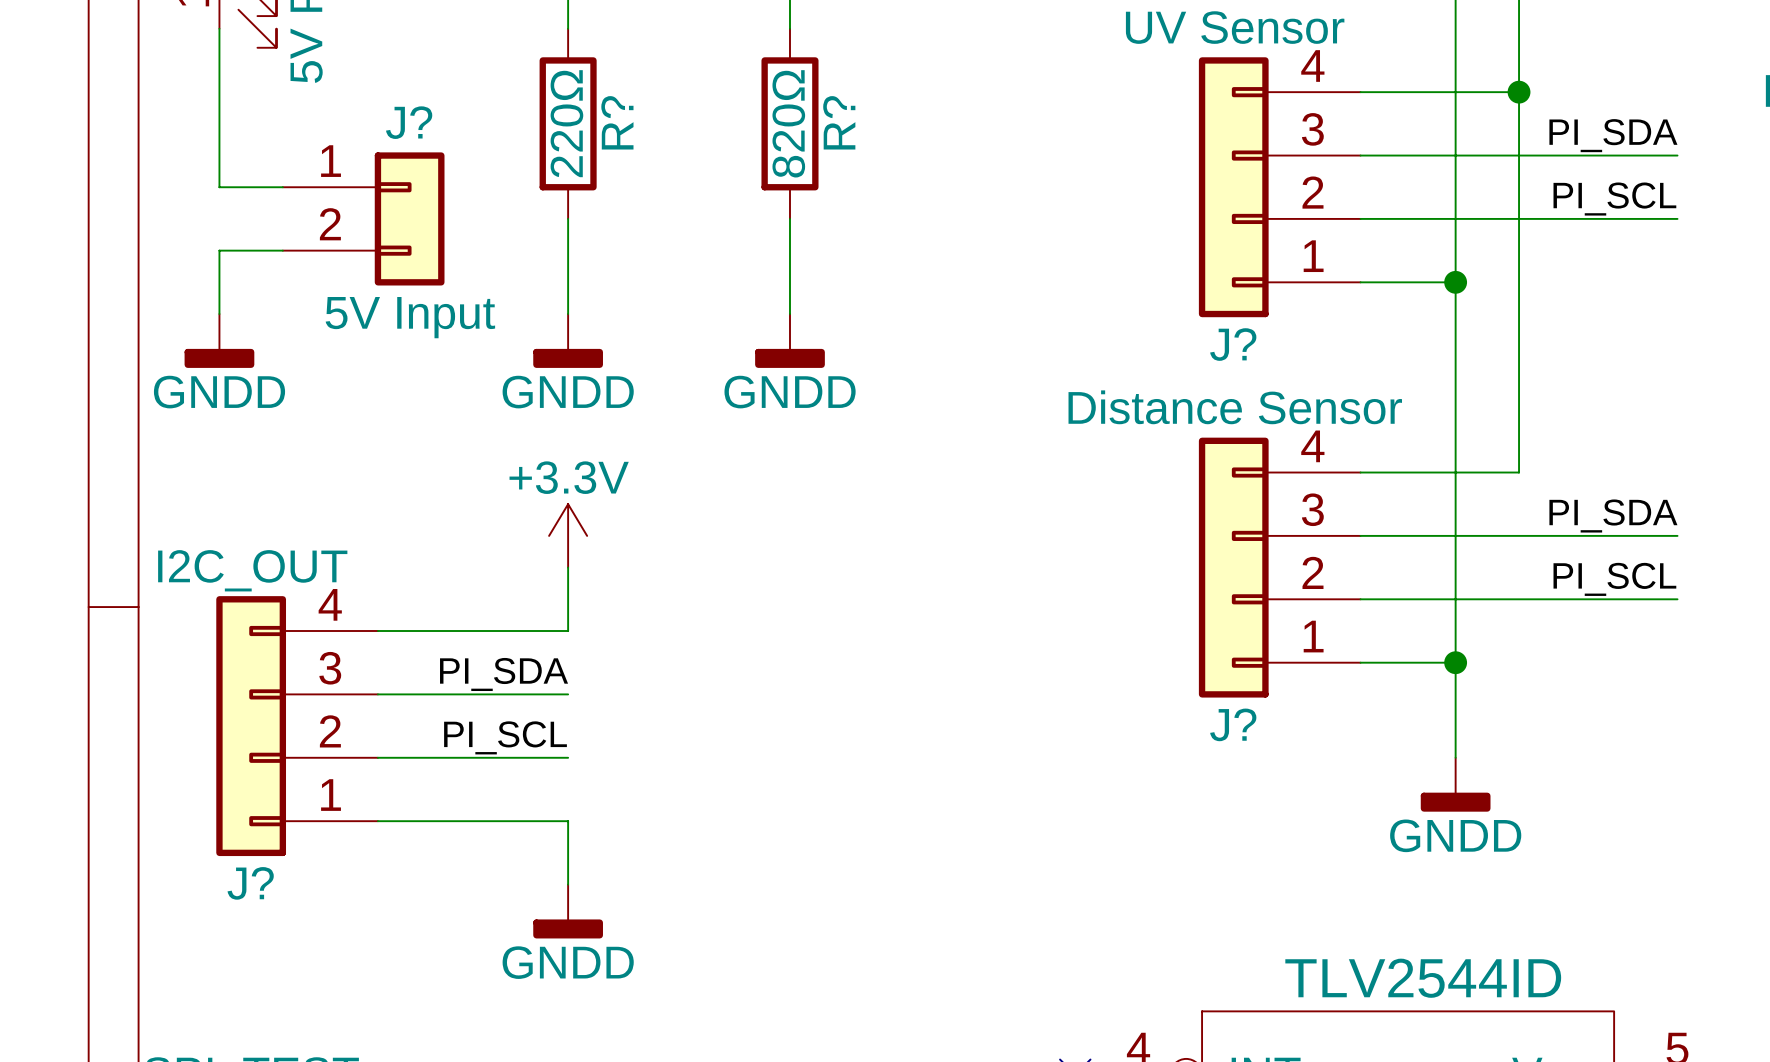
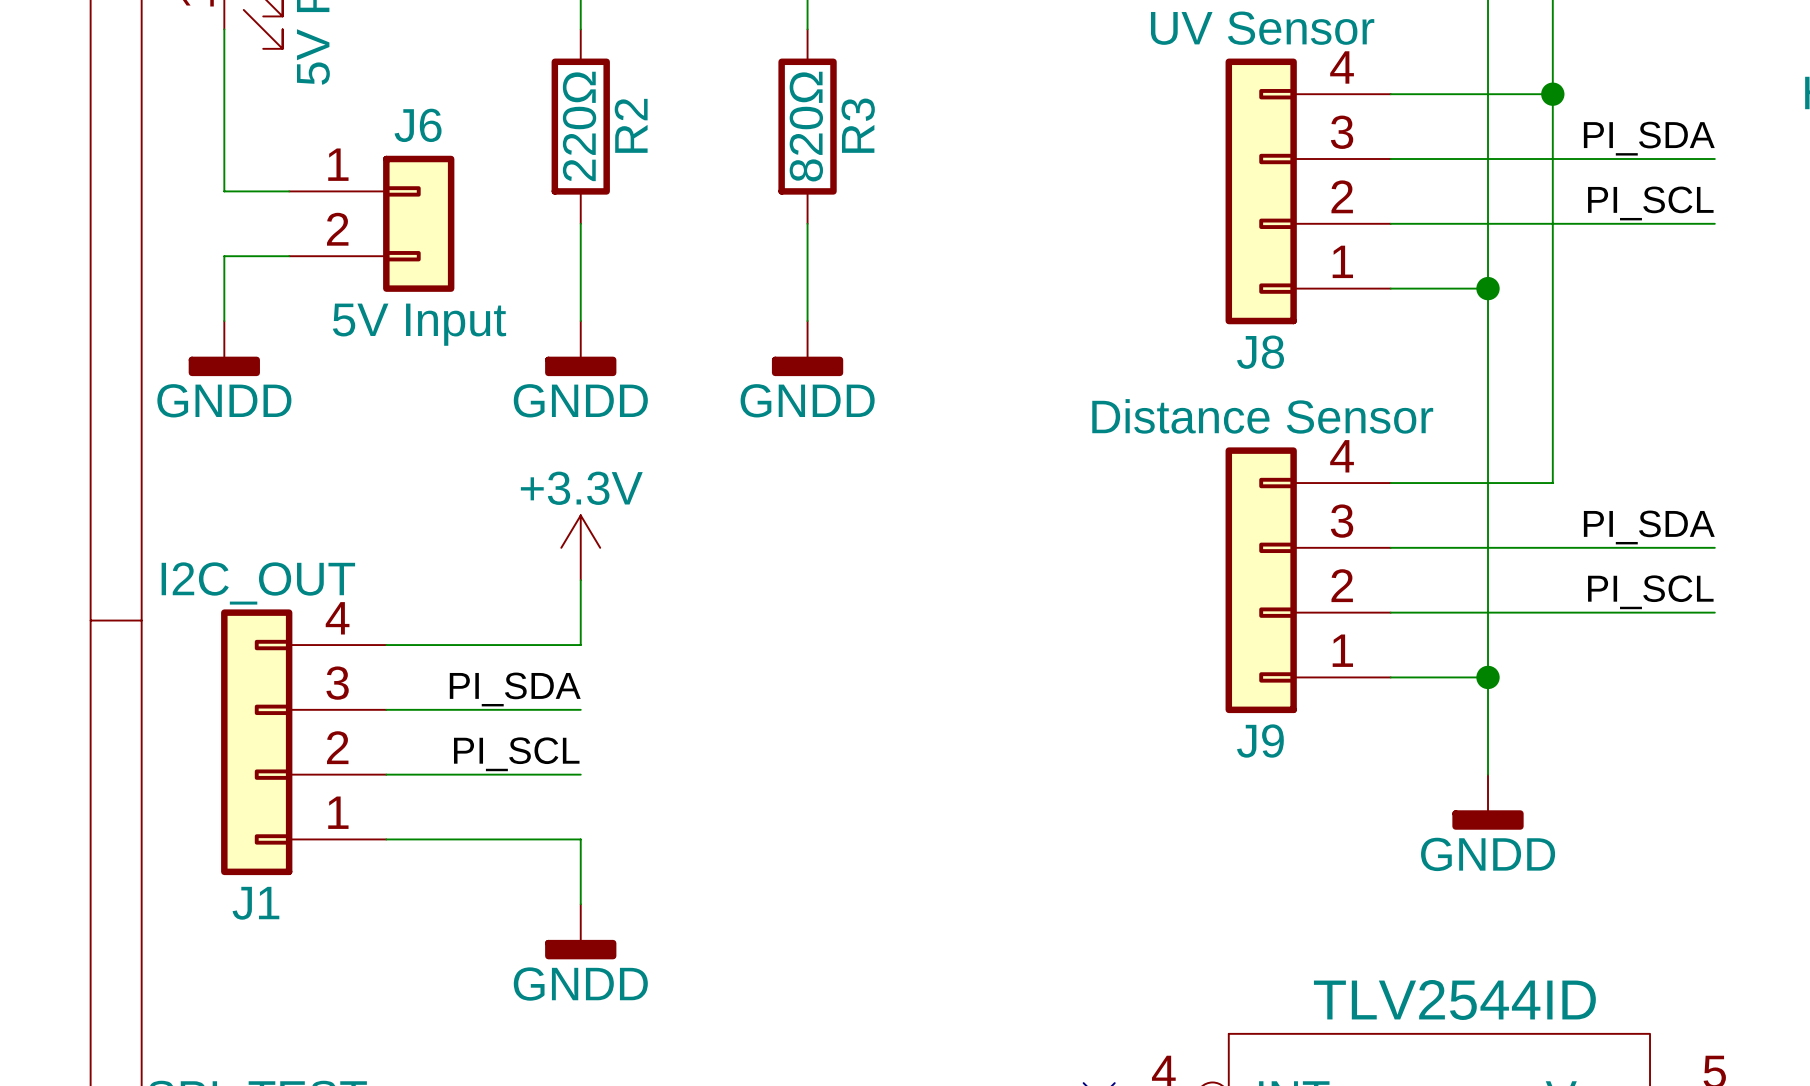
J? name: J? (409, 122) -> J6 (418, 125)
R? name: R? (617, 122) -> R2 (631, 125)
R? name: R? (839, 122) -> R3 (858, 125)
J? name: J? (1233, 344) -> J8 (1260, 352)
J? name: J? (1233, 724) -> J9 (1260, 741)
J? name: J? (250, 883) -> J1 (255, 903)

